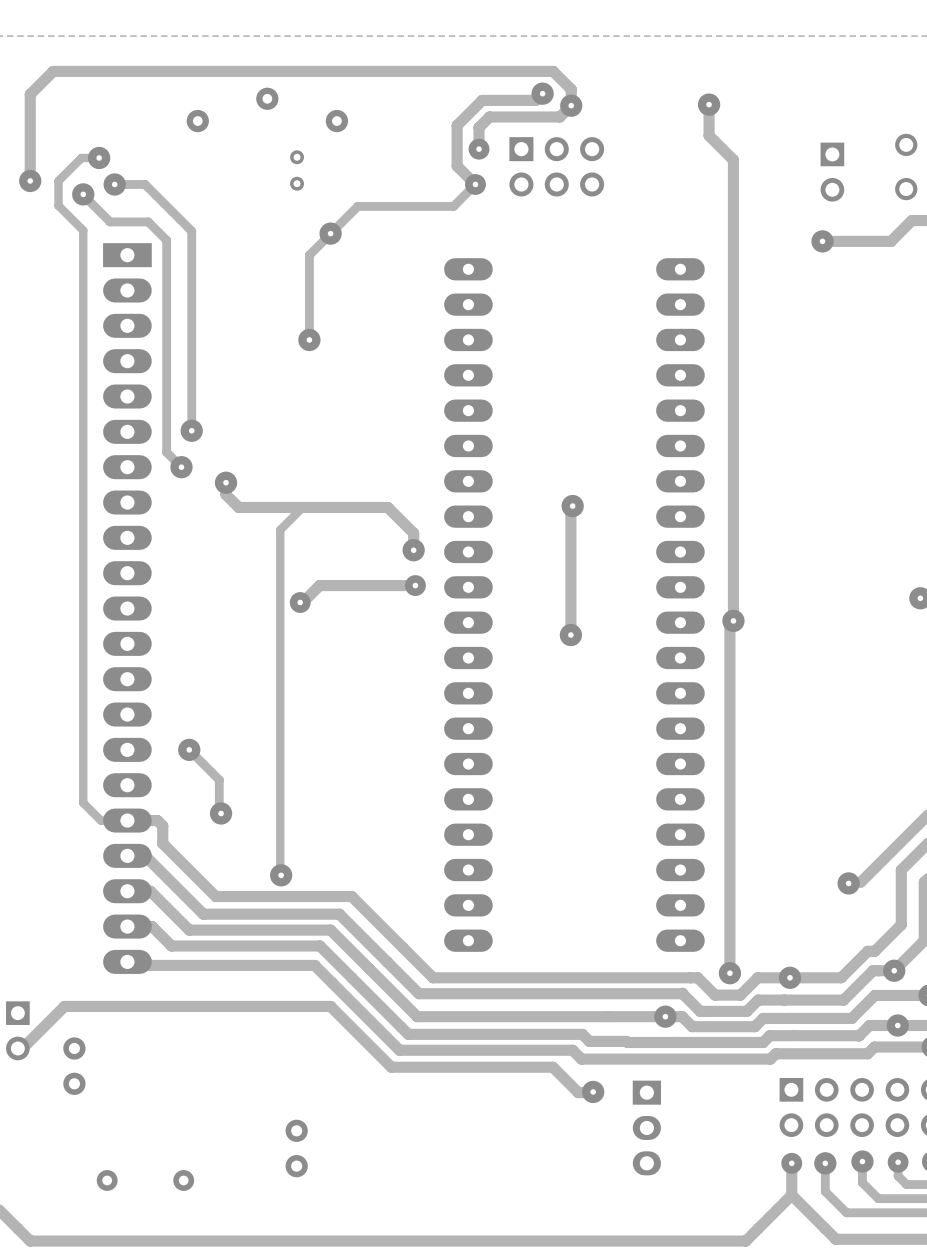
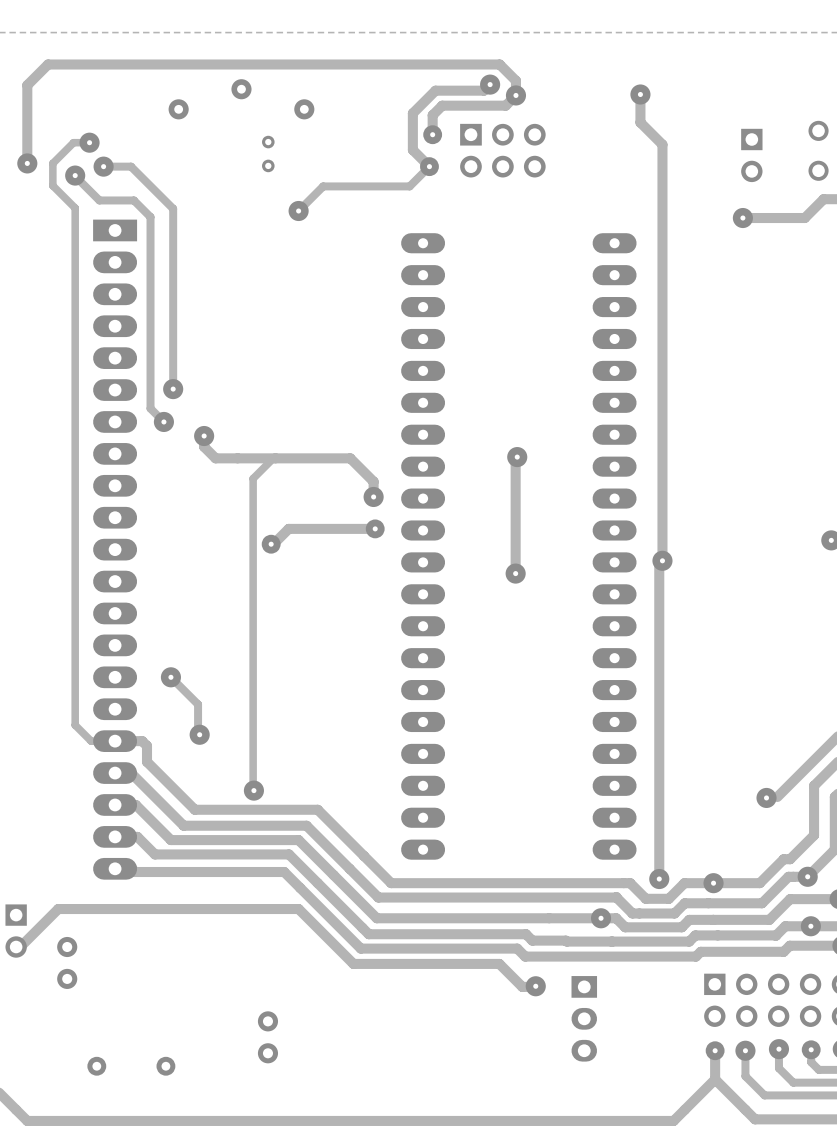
track: (330, 233) (309, 255) (309, 339) -> none
via: (309, 339) -> none

